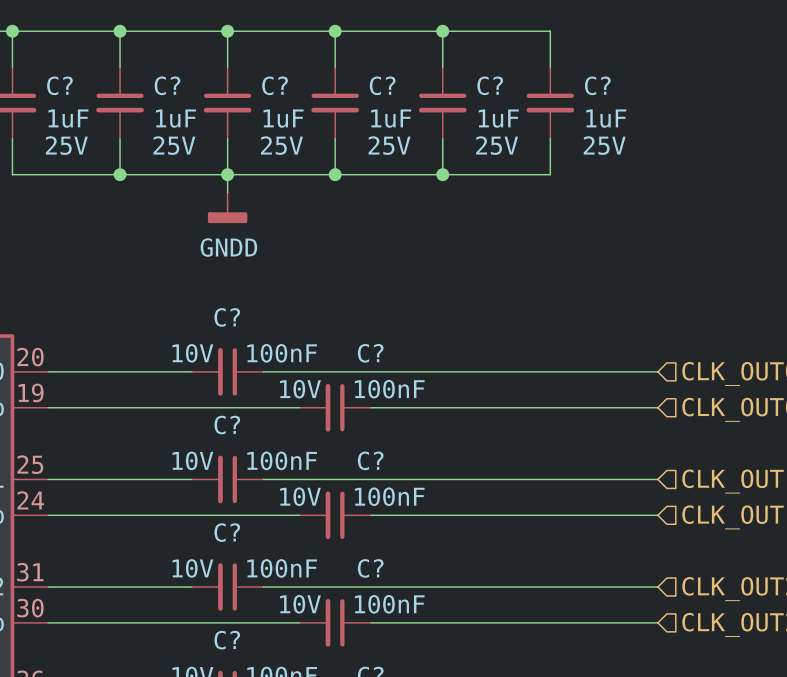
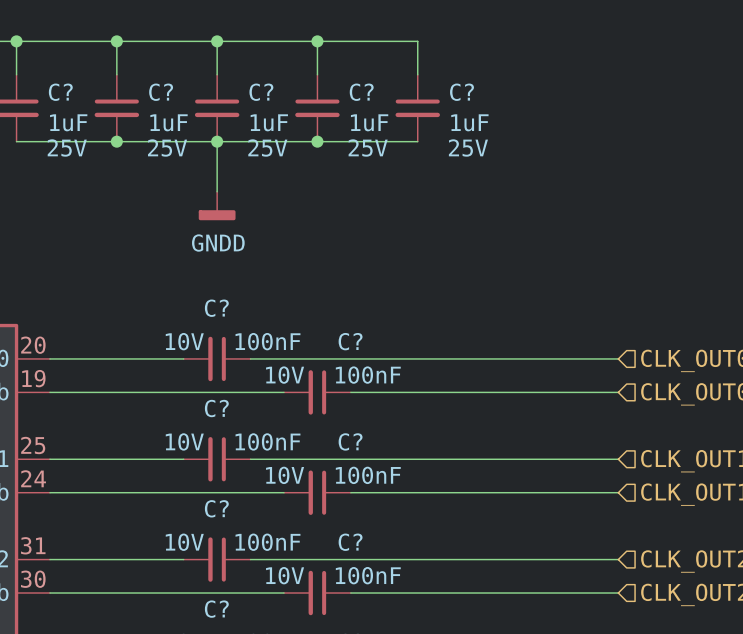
wire: (442, 31) (550, 31) (550, 67) -> none
junction: (442, 31) -> none
C?: 1uF (550, 102) -> none
wire: (12, 138) (12, 174) (550, 174) (550, 138) -> (16, 141) (417, 141)
wire: (120, 138) (120, 174) -> none
wire: (335, 138) (335, 174) -> none
wire: (442, 138) (442, 174) -> none
junction position: (120, 174) -> (116, 141)
junction position: (227, 174) -> (217, 141)
junction position: (335, 174) -> (317, 141)
junction: (442, 174) -> none

